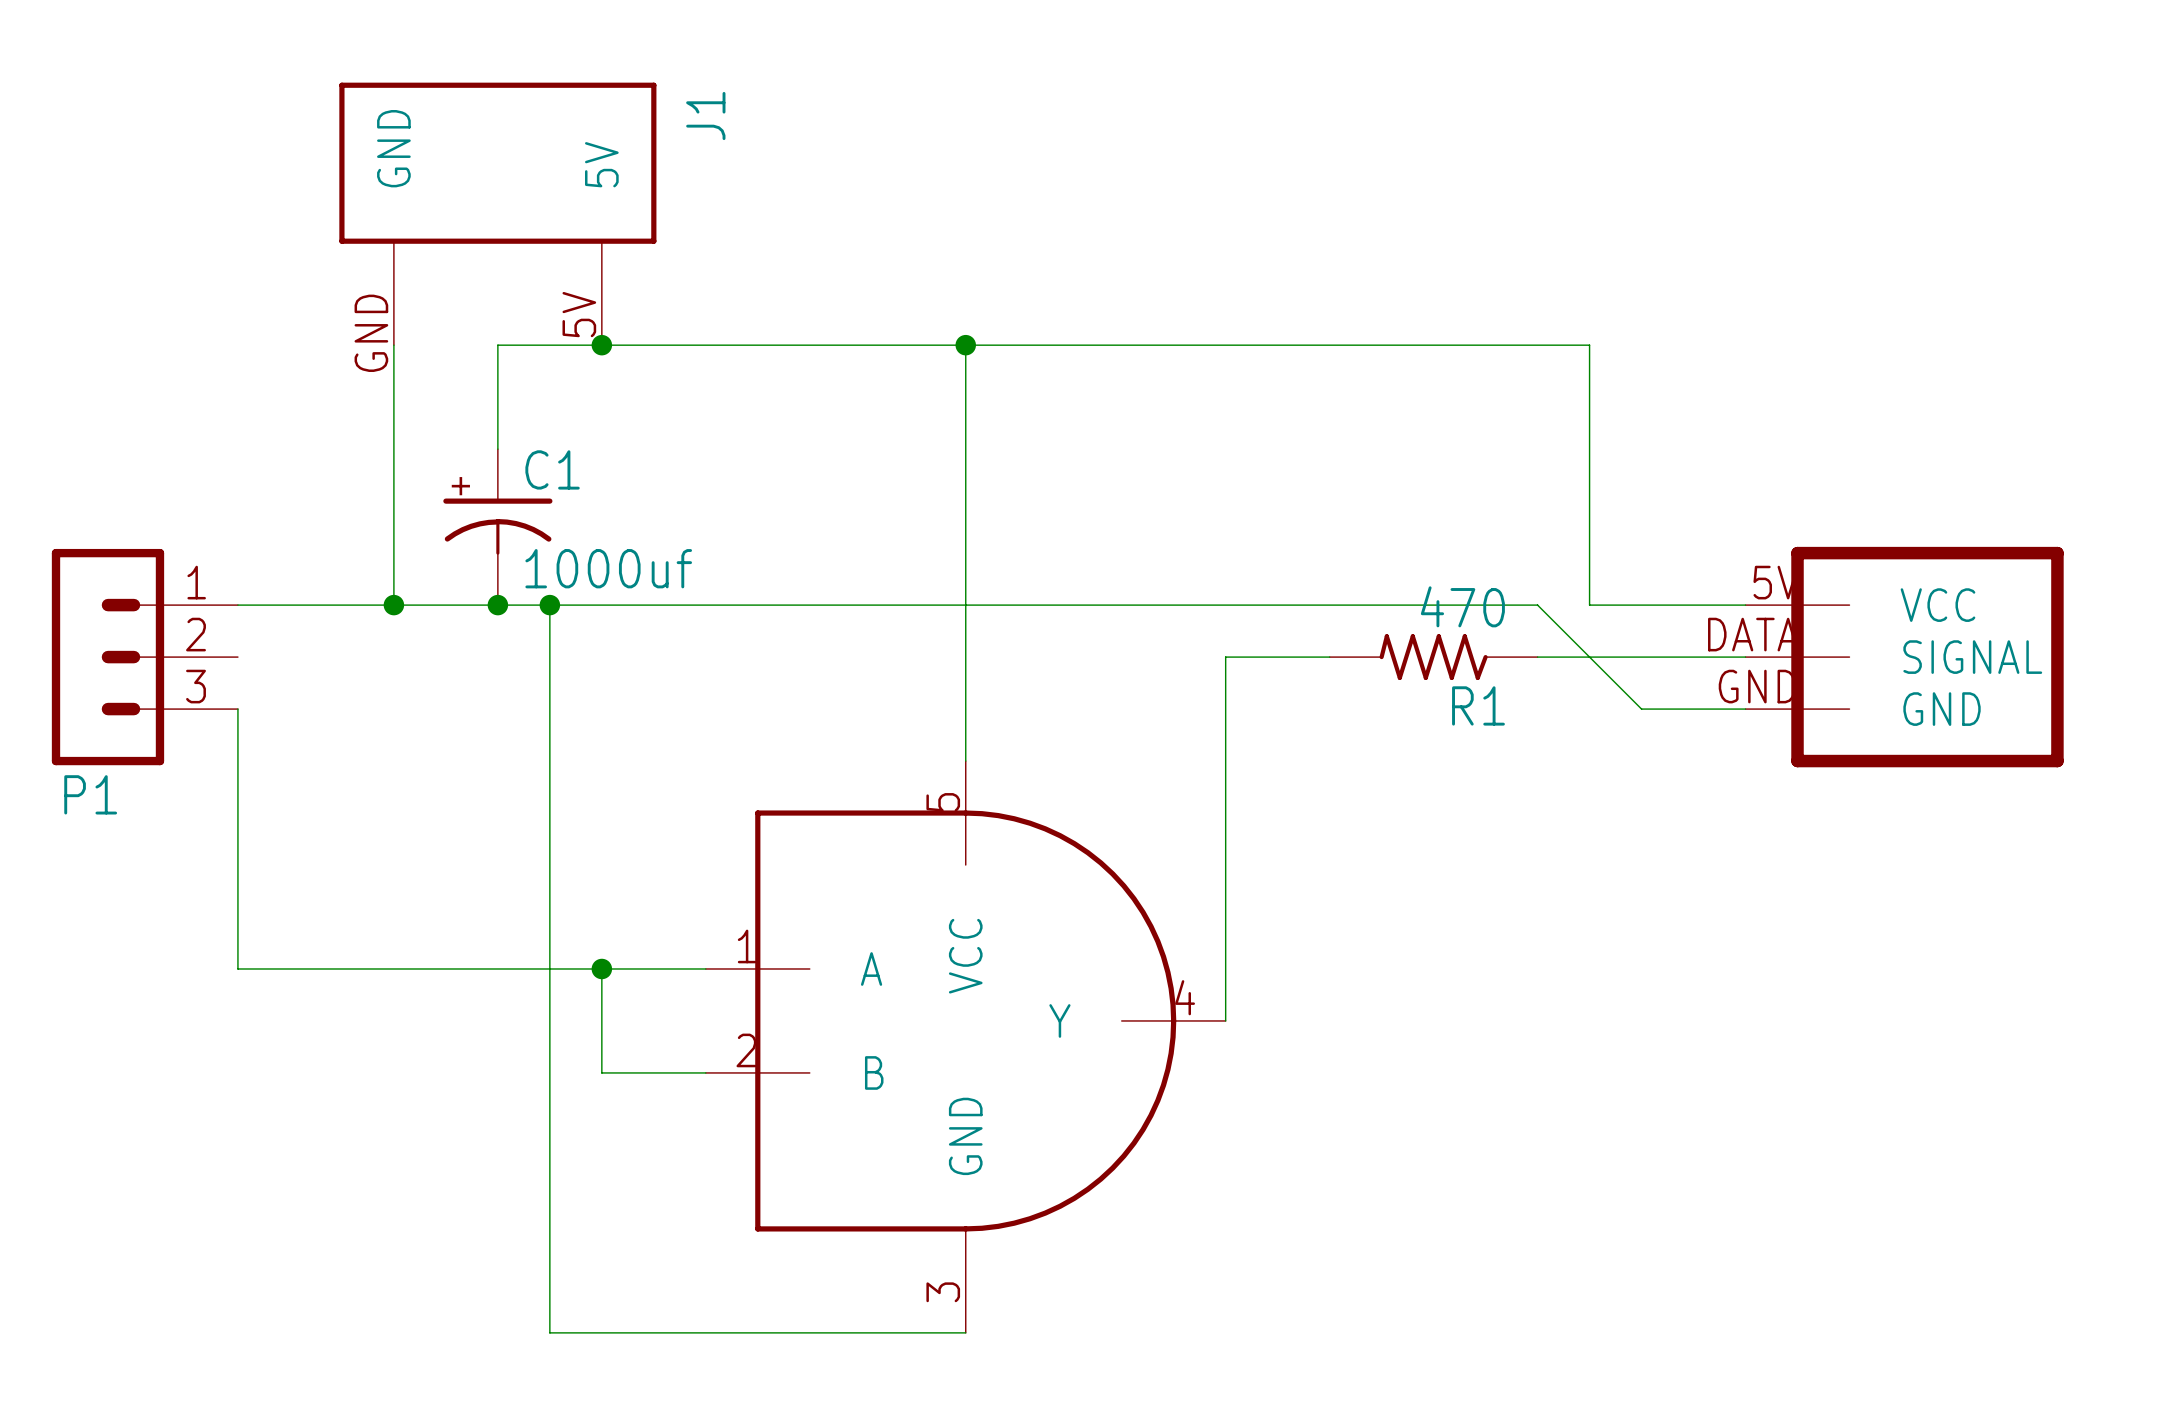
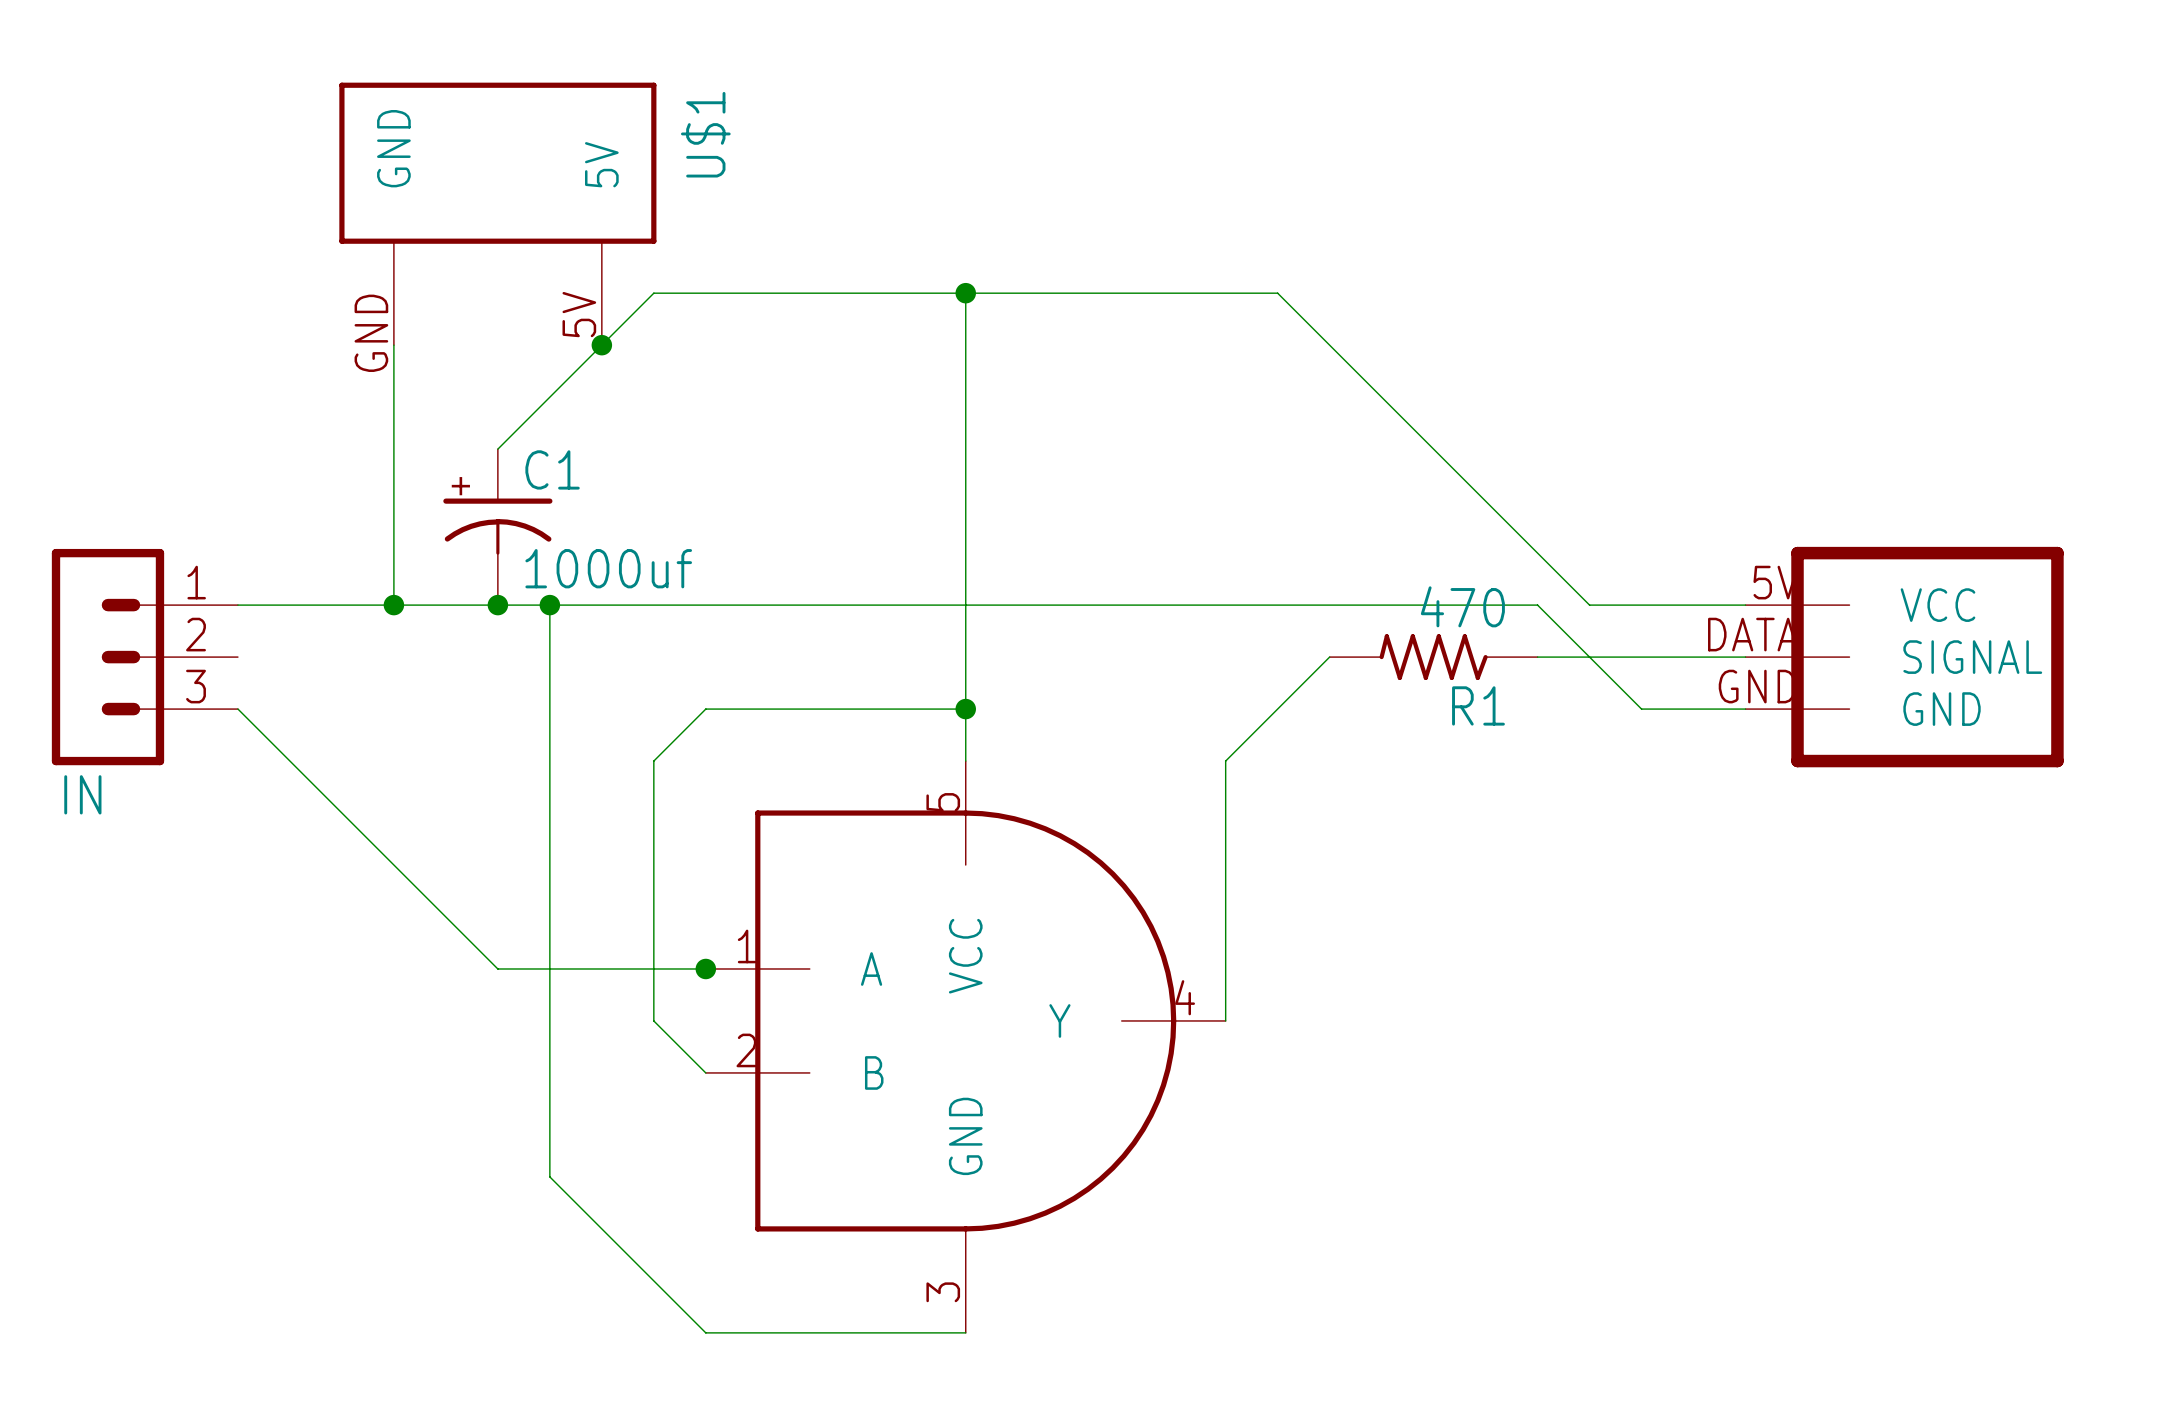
J1 name: J1 (705, 116) -> U$1 (705, 134)
wire: none -> (965, 293) (965, 345)
junction position: (965, 345) -> (965, 293)
wire: (497, 449) (497, 345) (1589, 345) (1589, 605) -> (497, 449) (653, 293) (1277, 293) (1589, 605)
wire: (1329, 657) (1225, 657) (1225, 761) -> (1329, 657) (1225, 761)
wire: (237, 709) (237, 968) (497, 968) -> (237, 709) (497, 968)
junction: none -> (965, 709)
P1 name: P1 (90, 794) -> IN (82, 794)
wire: (601, 968) (601, 1072) (705, 1072) -> (965, 709) (705, 709) (653, 761) (653, 1020) (705, 1072)
junction position: (601, 968) -> (705, 968)
wire: (549, 1176) (549, 1332) (705, 1332) -> (549, 1176) (705, 1332)

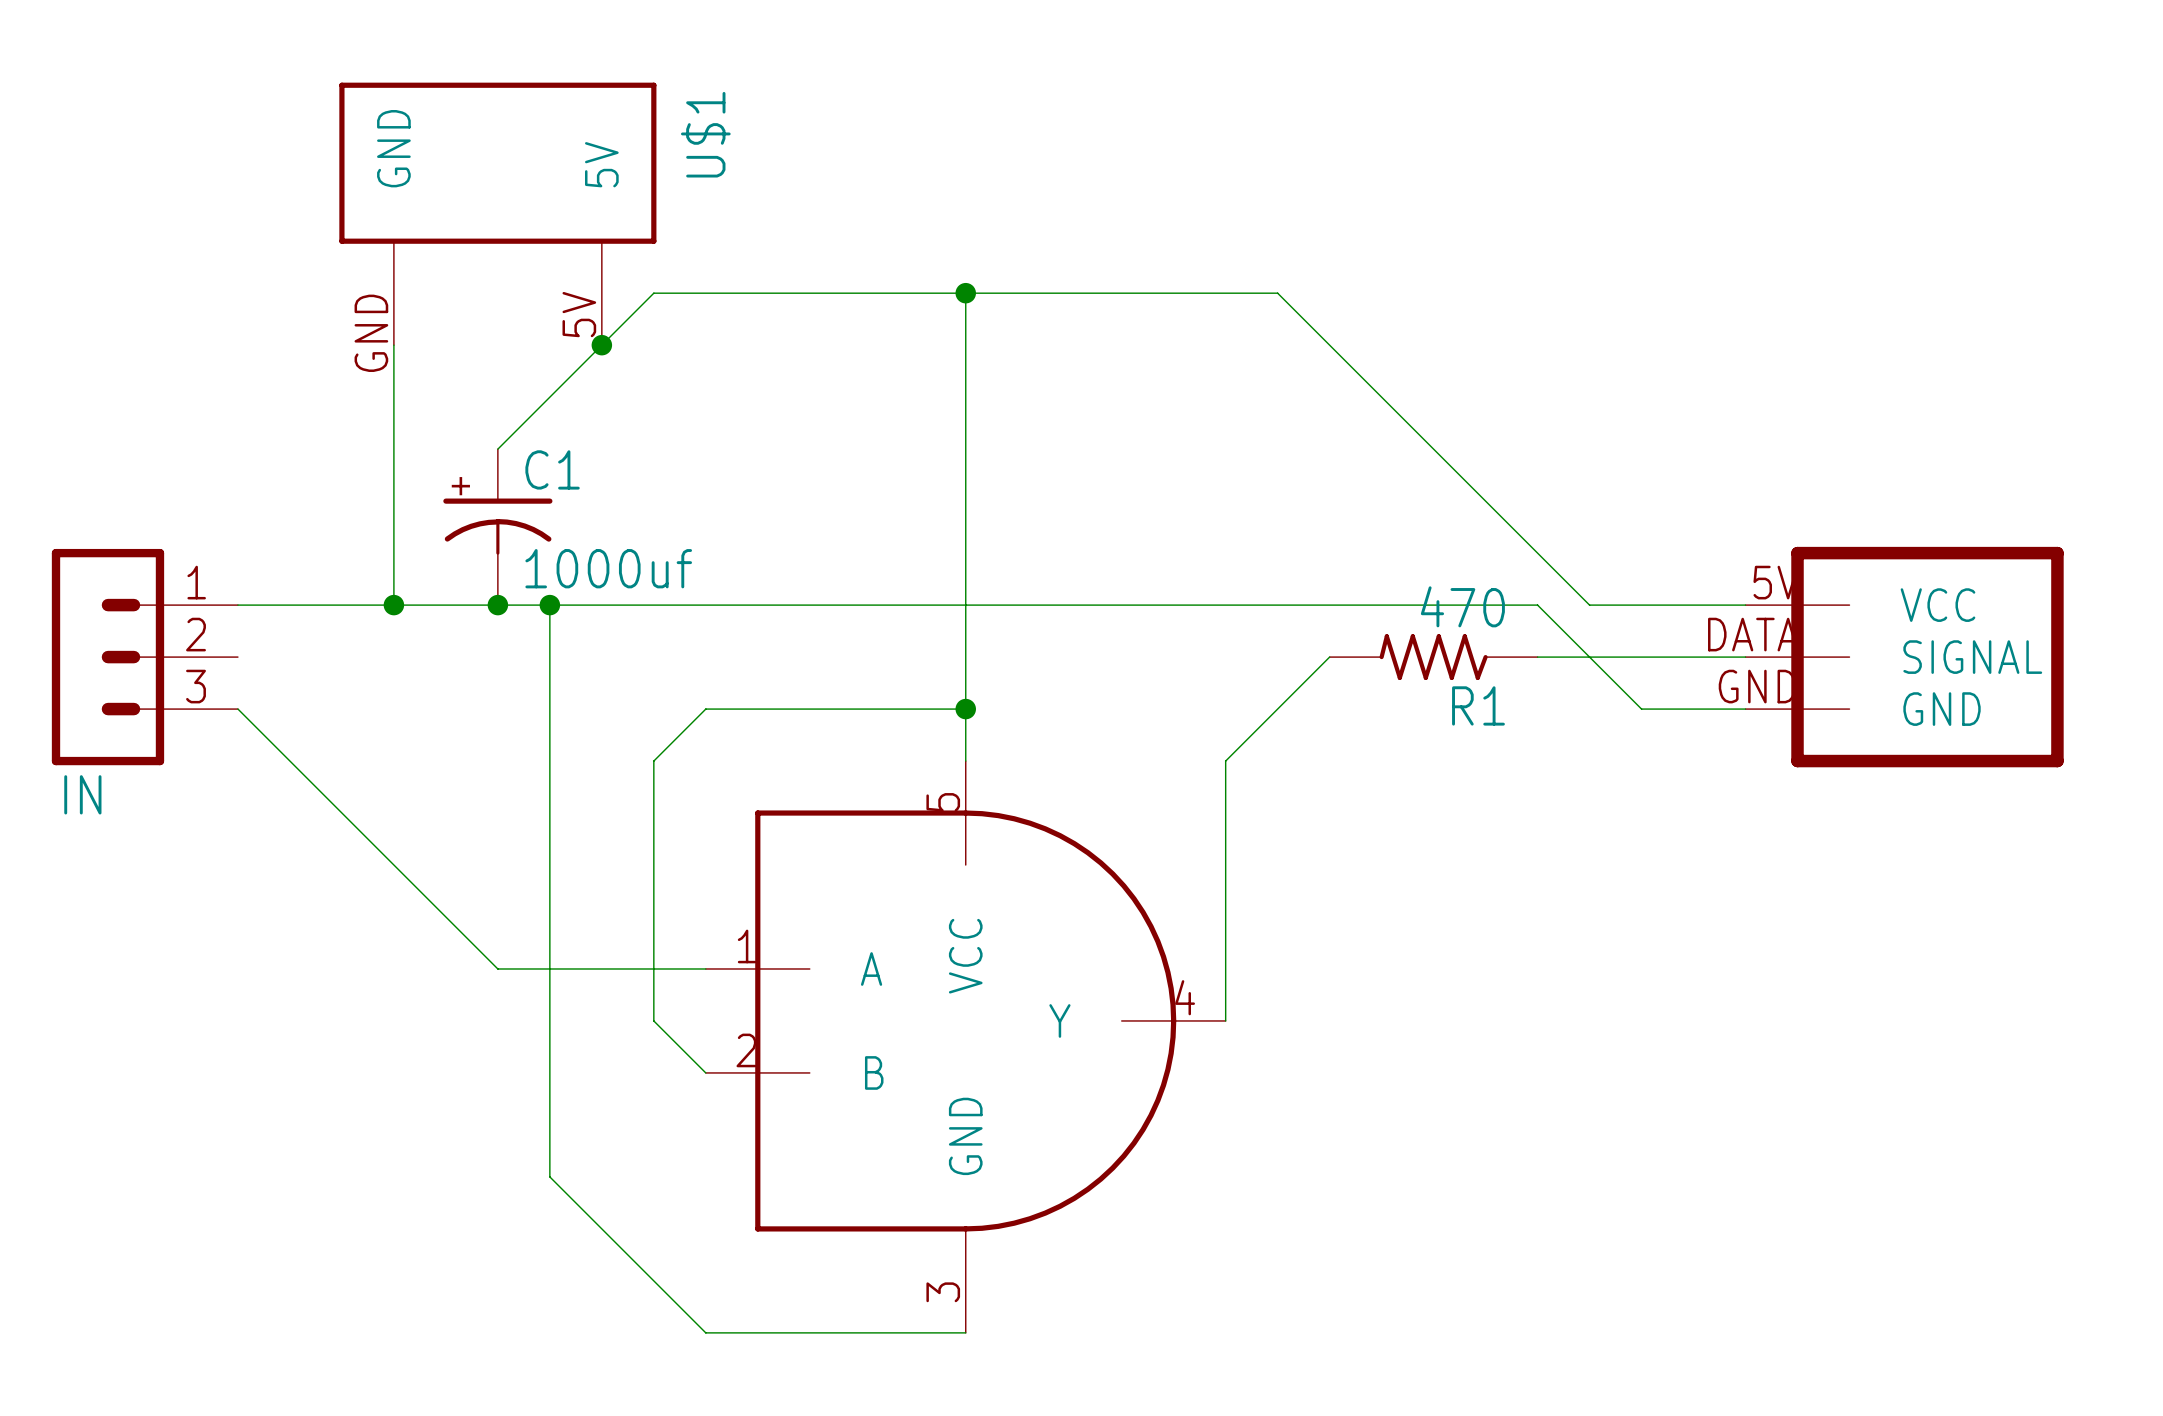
junction: (705, 968) -> none

